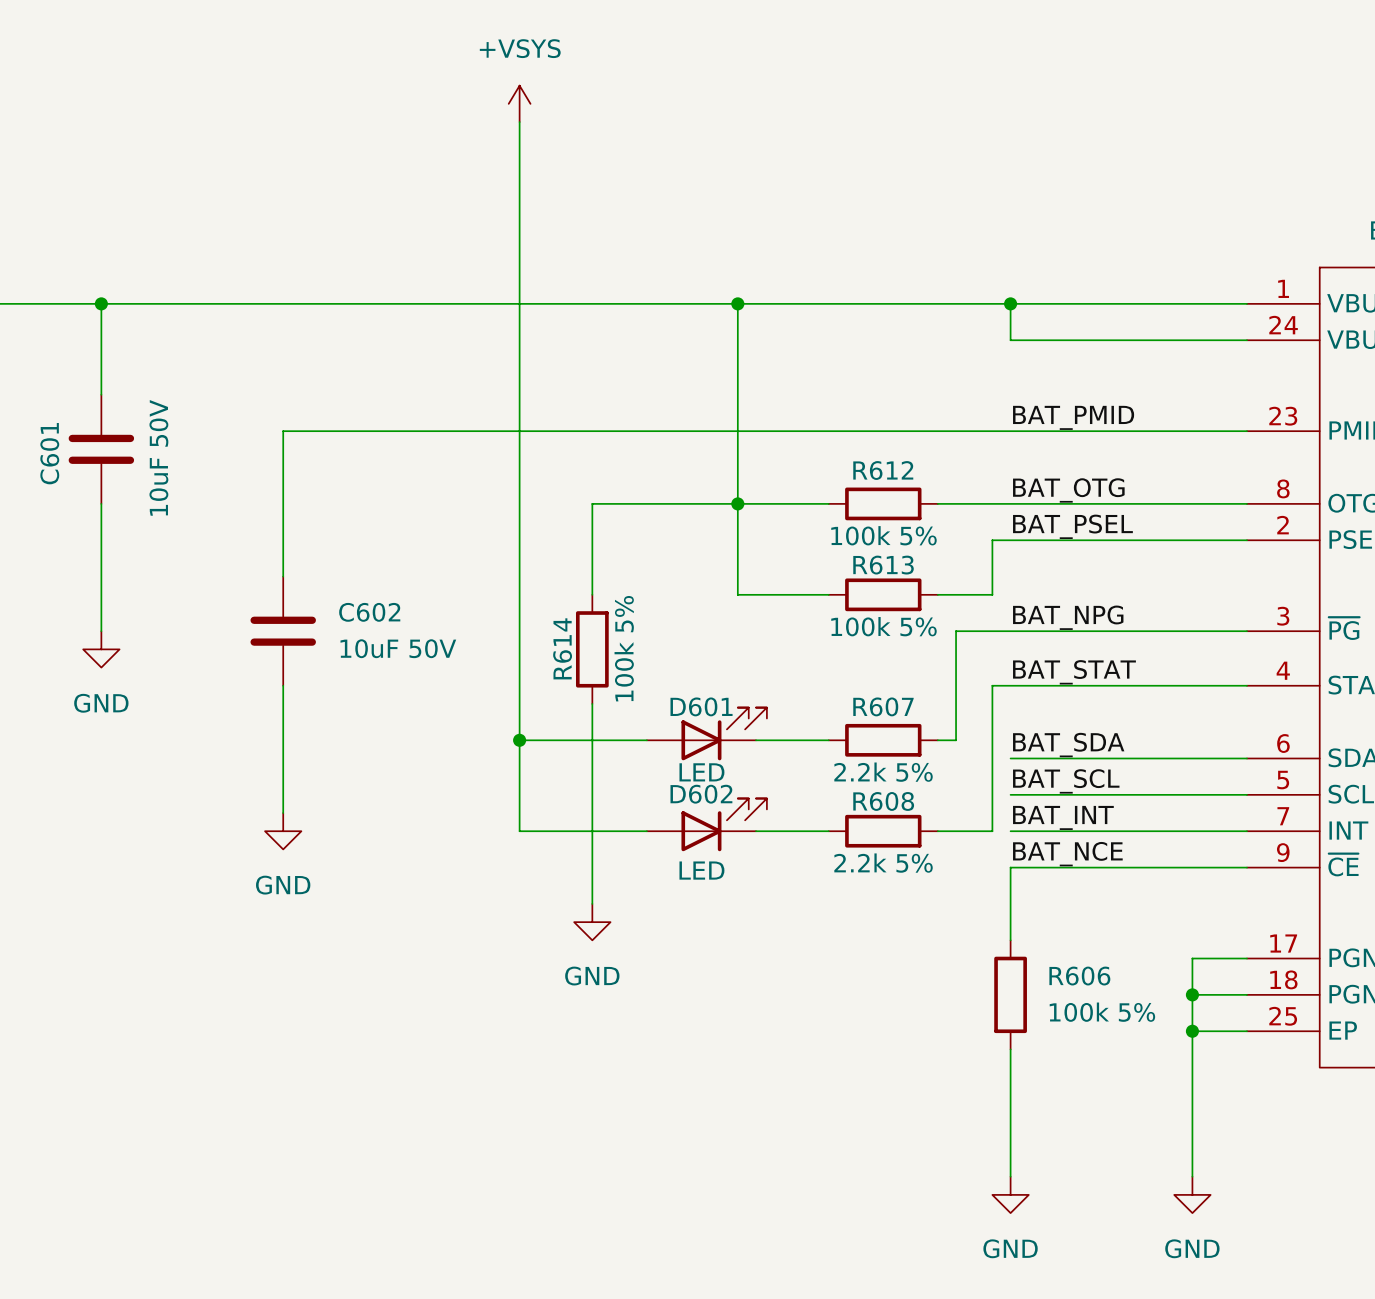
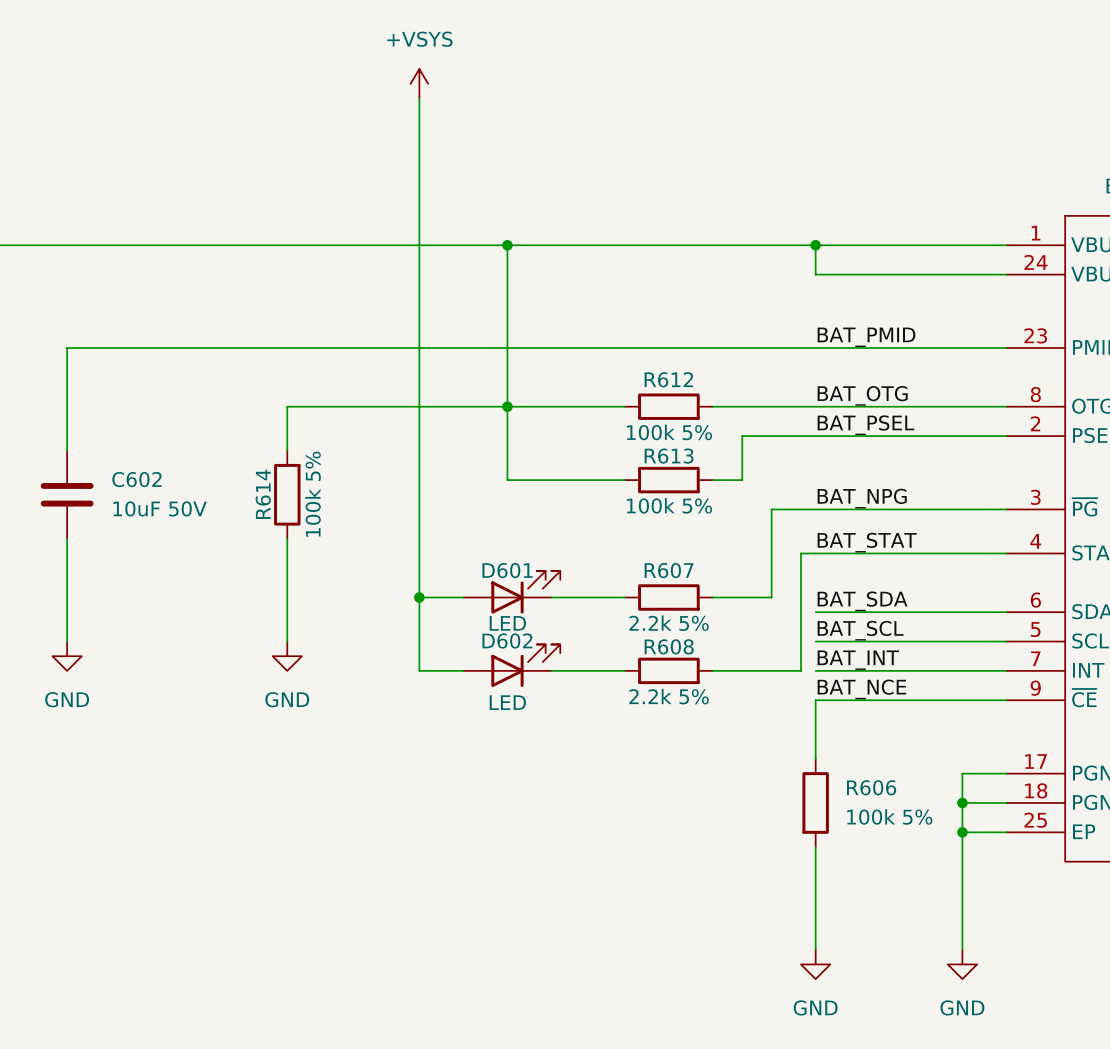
wire: (101, 303) (101, 394) -> none
junction: (101, 303) -> none
junction: none -> (507, 245)
wire: (737, 303) (737, 594) -> (507, 245) (507, 480) (595, 480)
junction: (737, 303) -> none
wire: (283, 431) (283, 576) -> (228, 348) (67, 348) (67, 450)
C601: 10uF 50V (101, 449) -> none
wire: (101, 503) (101, 631) -> (67, 538) (67, 641)
wire: (592, 503) (592, 594) -> (478, 406) (287, 406) (287, 450)
junction: none -> (507, 406)
junction: (737, 503) -> none
wire: (774, 503) (828, 503) -> (712, 406) (756, 406)
R612 position: (883, 503) -> (668, 406)
wire: (992, 540) (992, 594) (937, 594) -> (800, 436) (742, 436) (742, 480) (712, 480)
wire: (774, 594) (828, 594) -> none
R613 position: (883, 594) -> (668, 480)
C602 position: (283, 631) -> (67, 494)
power symbol: GND (101, 649) -> none
R614 position: (592, 649) -> (287, 494)
wire: (283, 685) (283, 813) -> (287, 538) (287, 641)
wire: (592, 703) (592, 903) -> none
D601 position: (706, 733) -> (511, 592)
wire: (774, 740) (828, 740) -> (712, 597) (756, 597)
R607 position: (883, 740) -> (668, 597)
power symbol: none -> GND (67, 656)
D602 position: (706, 824) -> (511, 665)
power symbol position: GND (283, 831) -> GND (287, 656)
wire: (774, 831) (828, 831) -> (712, 670) (756, 670)
R608 position: (883, 831) -> (668, 670)
power symbol: GND (592, 922) -> none

